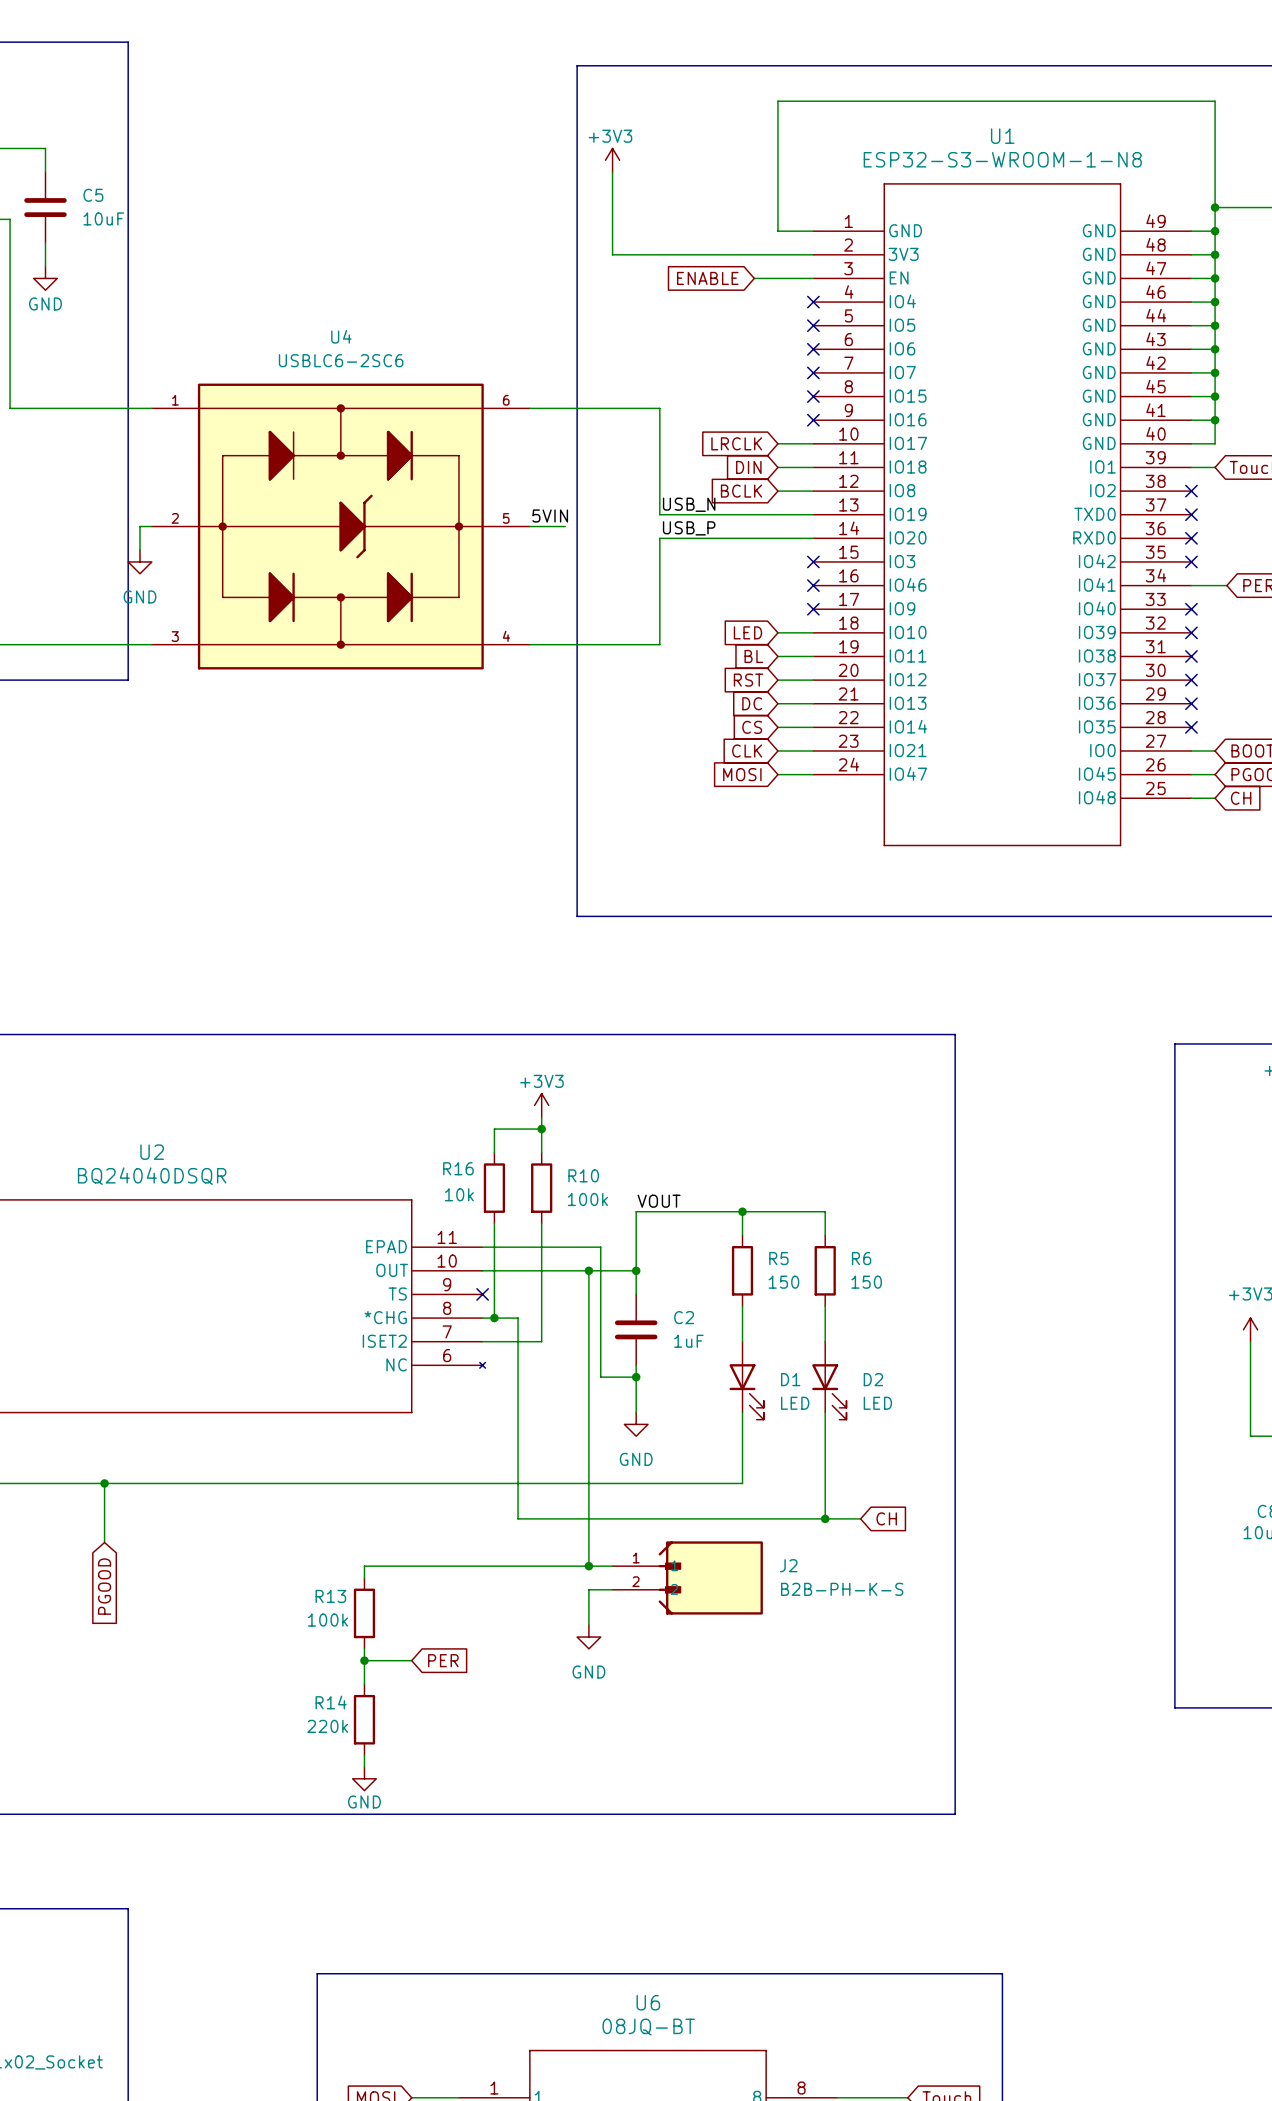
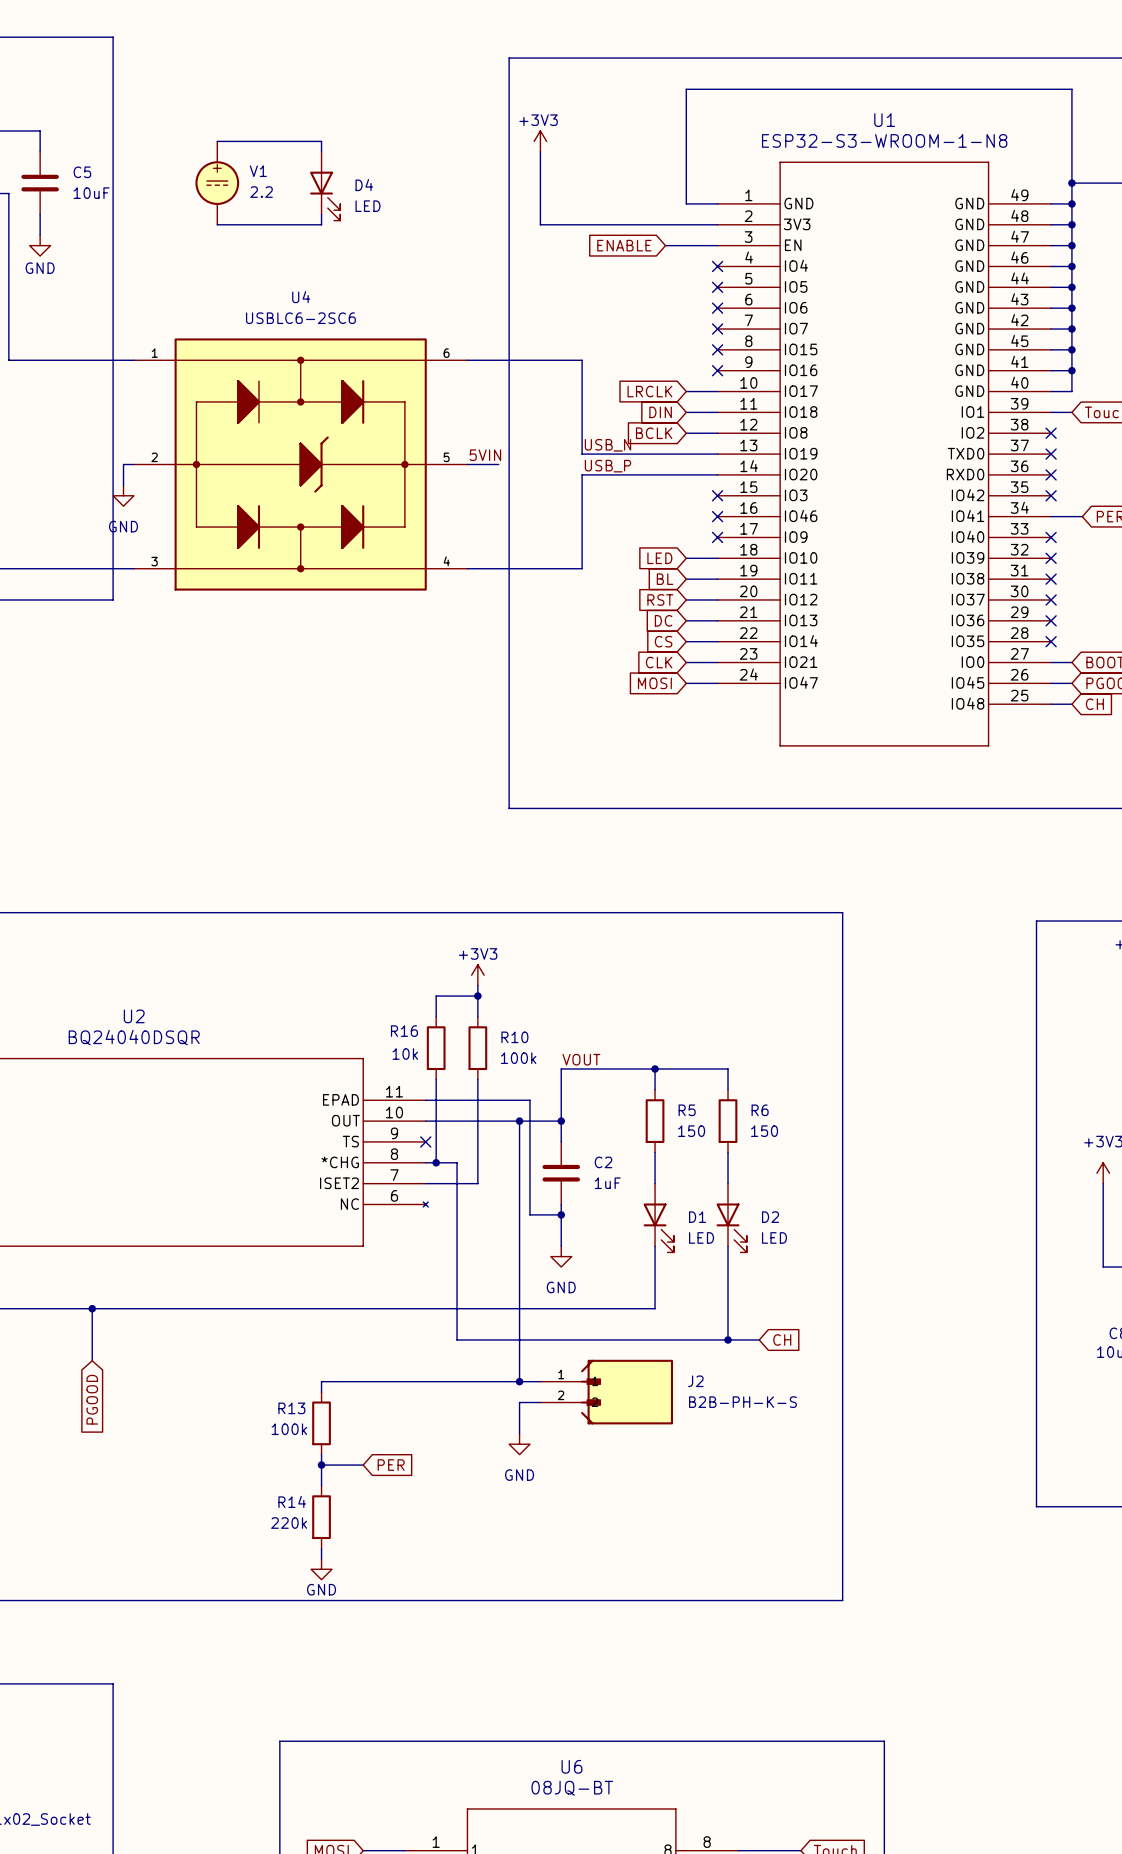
wire: none -> (217, 141) (321, 141) (321, 151)
V1: none -> 2.2 (217, 183)
D4: none -> LED (325, 186)
wire: none -> (321, 214) (321, 224) (217, 224)

